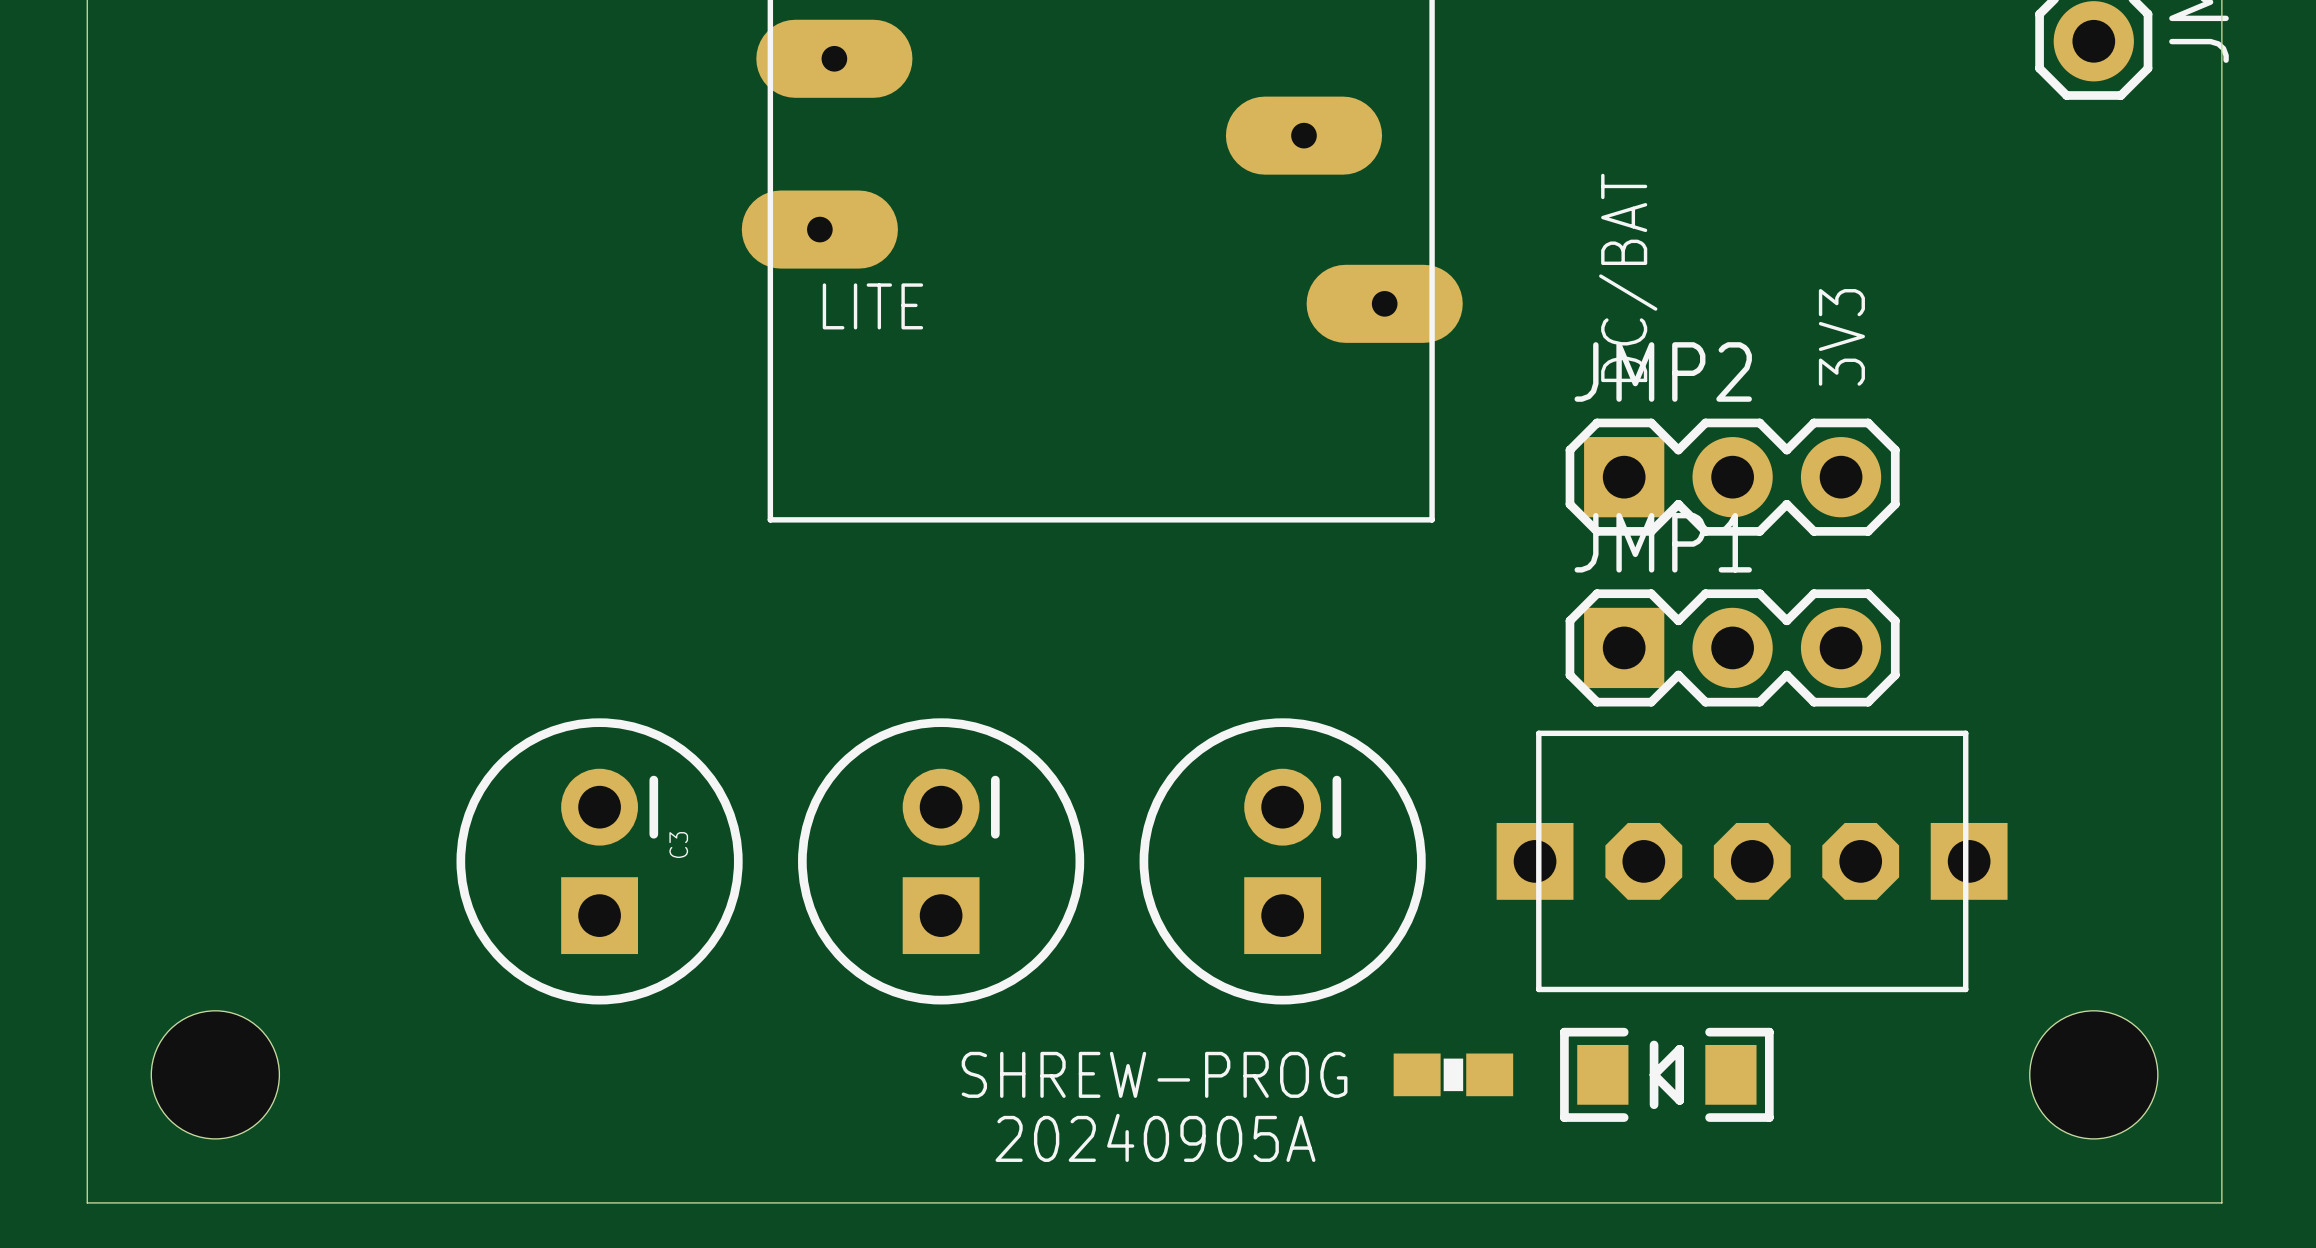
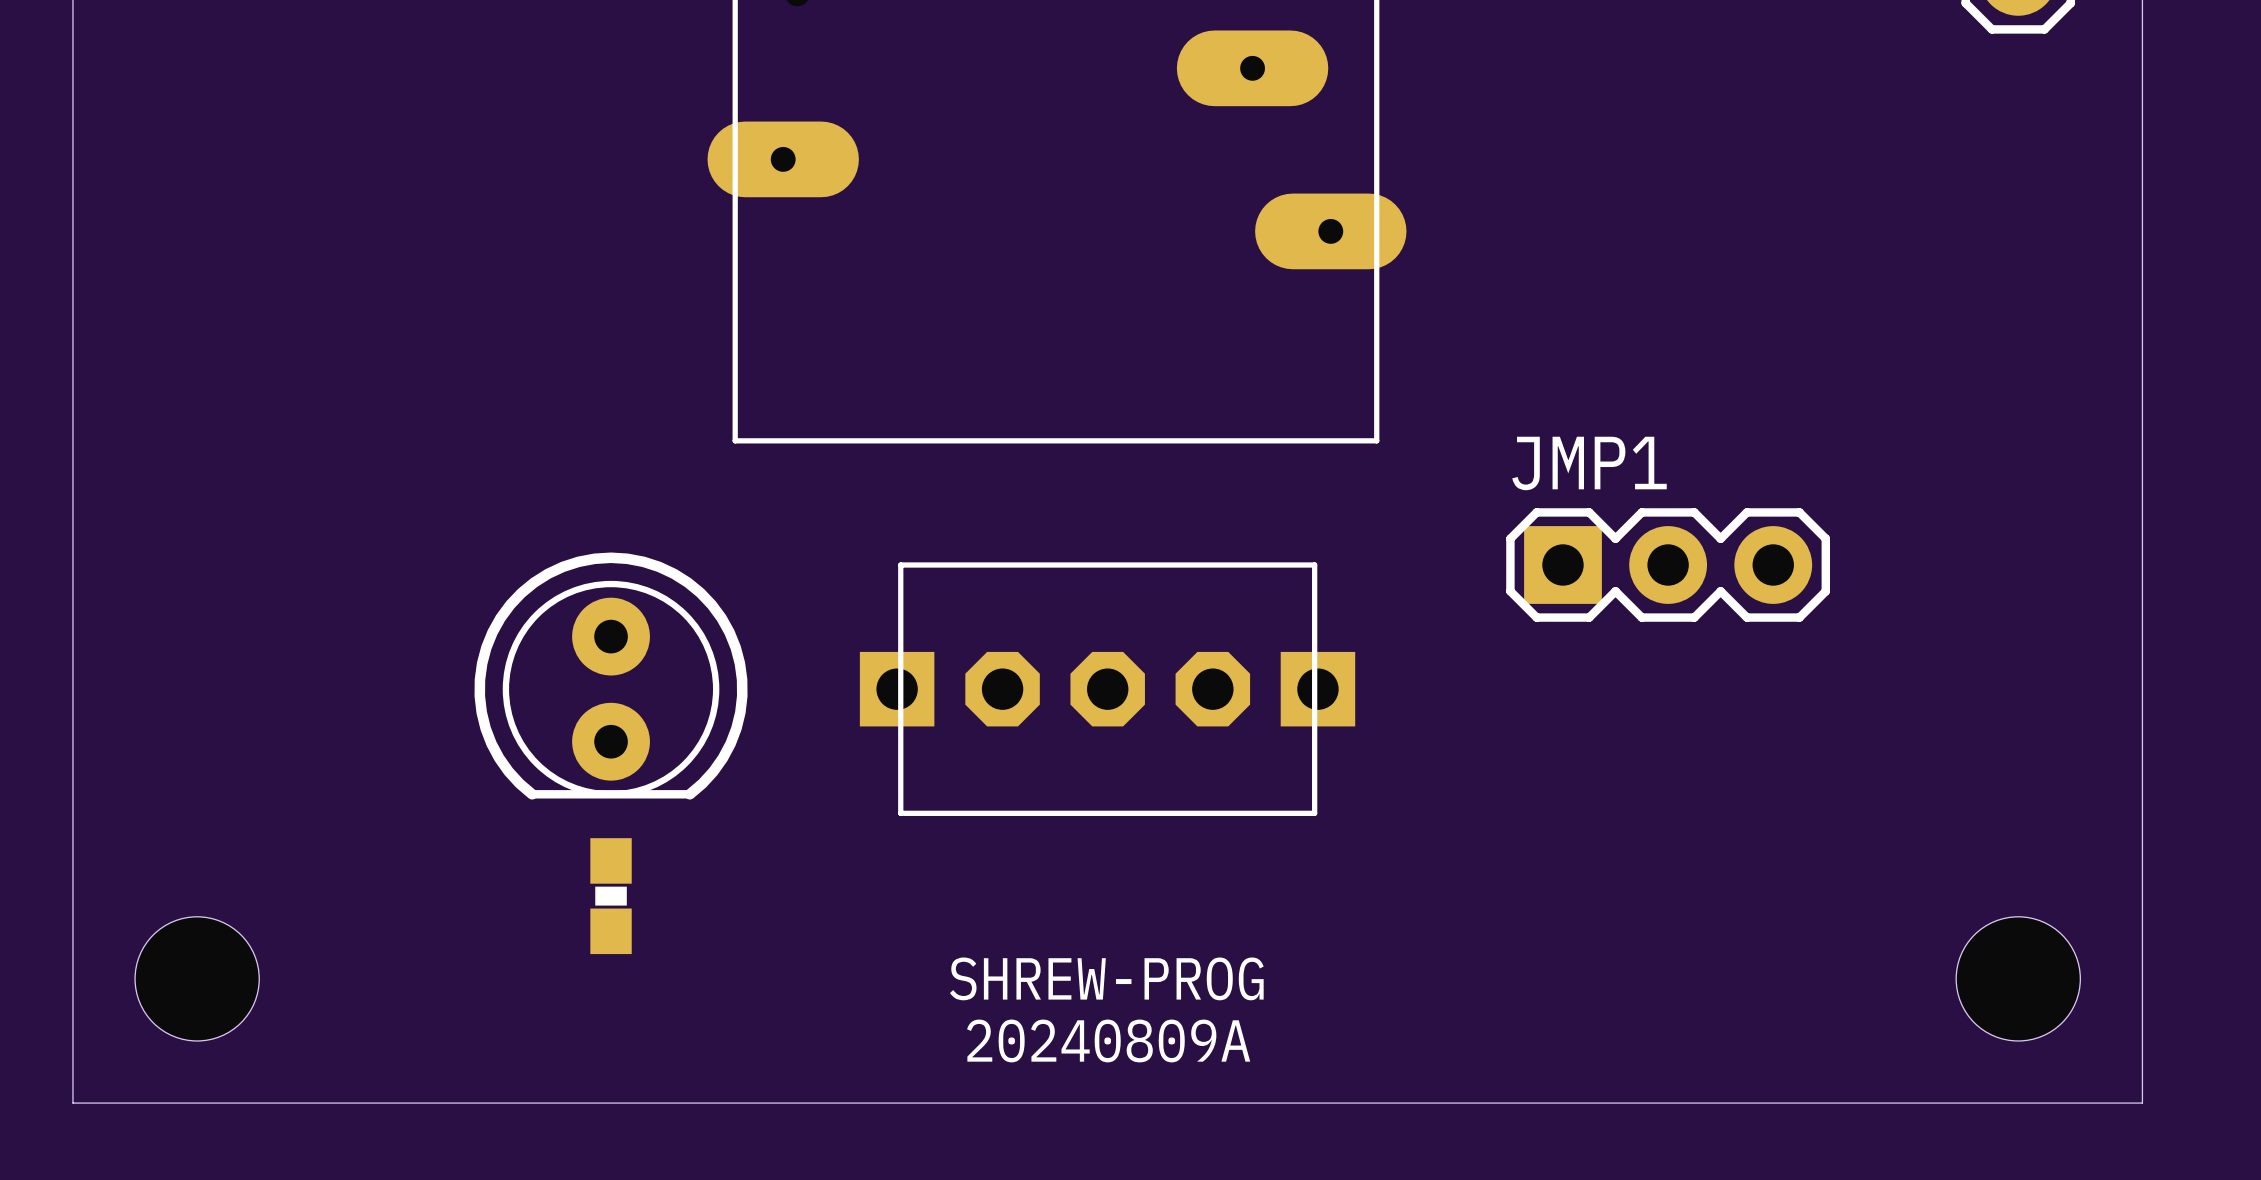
text: DC/BAT (1628, 277) -> none
text: LITE (872, 306) -> none
text: 3V3 (1841, 337) -> none
JMP2: (1732, 477) -> none
part: none -> (611, 676)
C3: (599, 861) -> none
part: (941, 861) -> none
part: (1282, 861) -> none
part position: (1752, 861) -> (1107, 689)
part rotation: 0° (1453, 1074) -> 90° clockwise (611, 896)
part position: (1453, 1074) -> (611, 896)
part: (1666, 1074) -> none
text: 20240905A (1155, 1137) -> 20240809A (1108, 1040)

